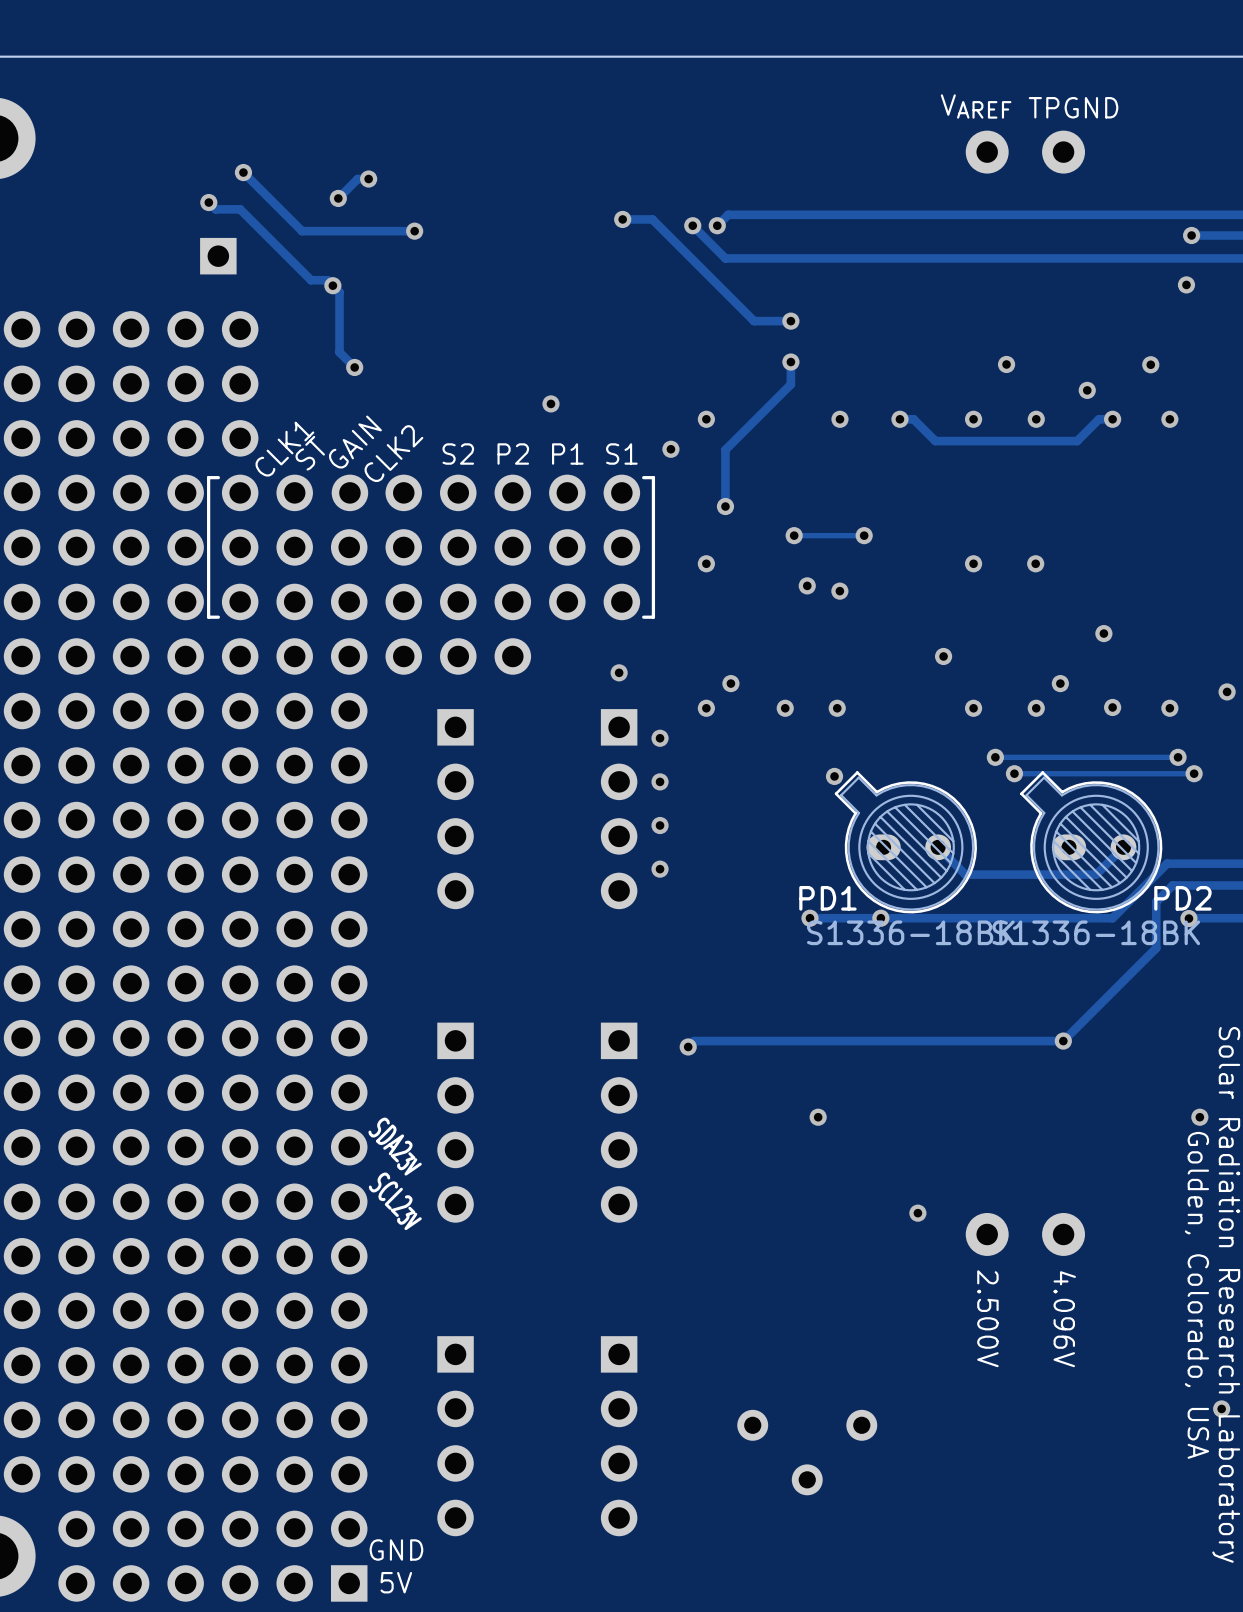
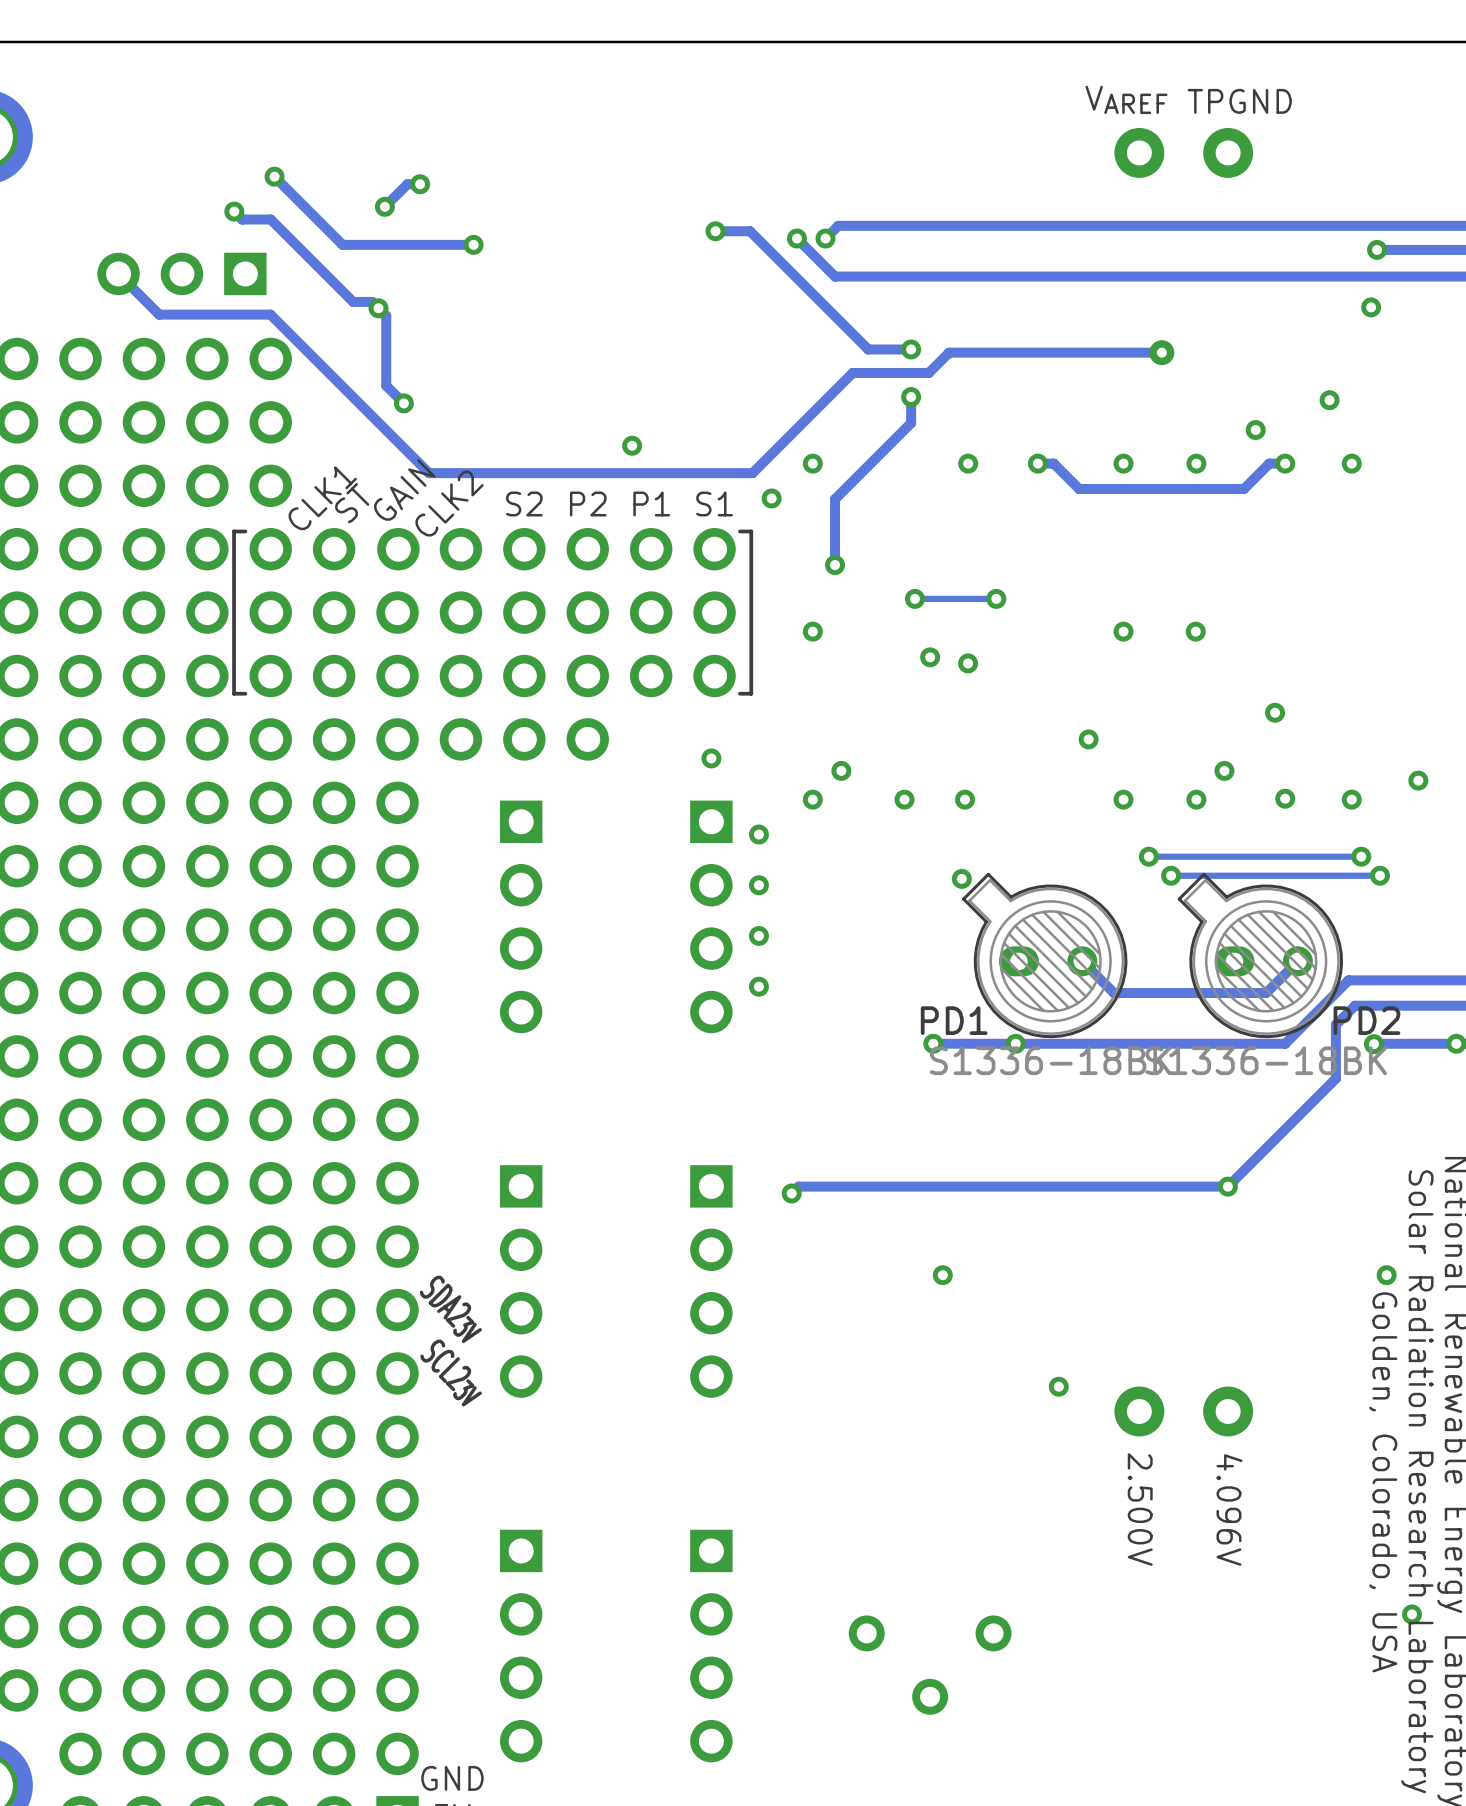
track: none -> (118, 273) (159, 314) (270, 314) (428, 473) (752, 473) (852, 372) (928, 372) (949, 352) (1161, 352)
part: none -> (181, 273)
via: none -> (1161, 352)
via: (1006, 364) -> none

